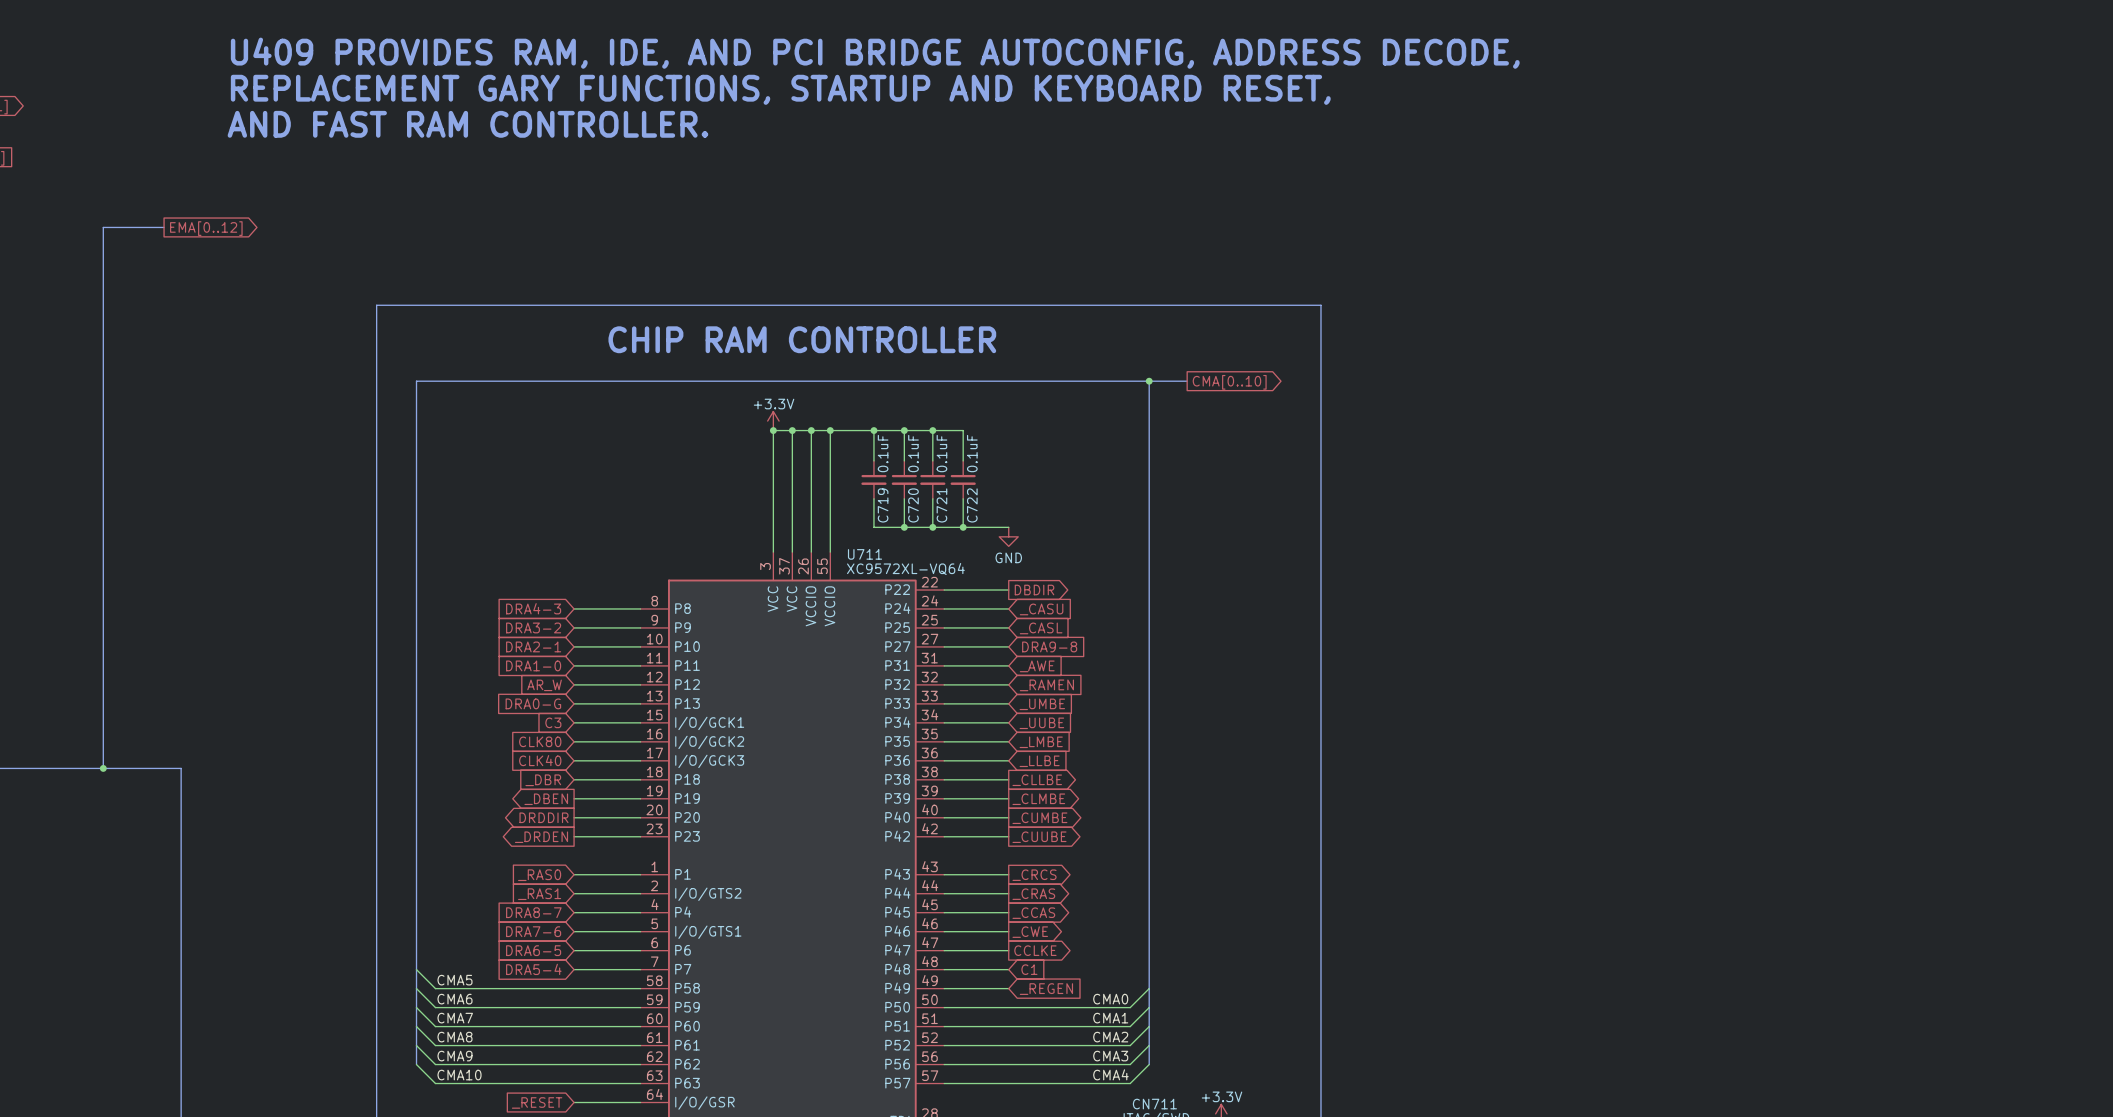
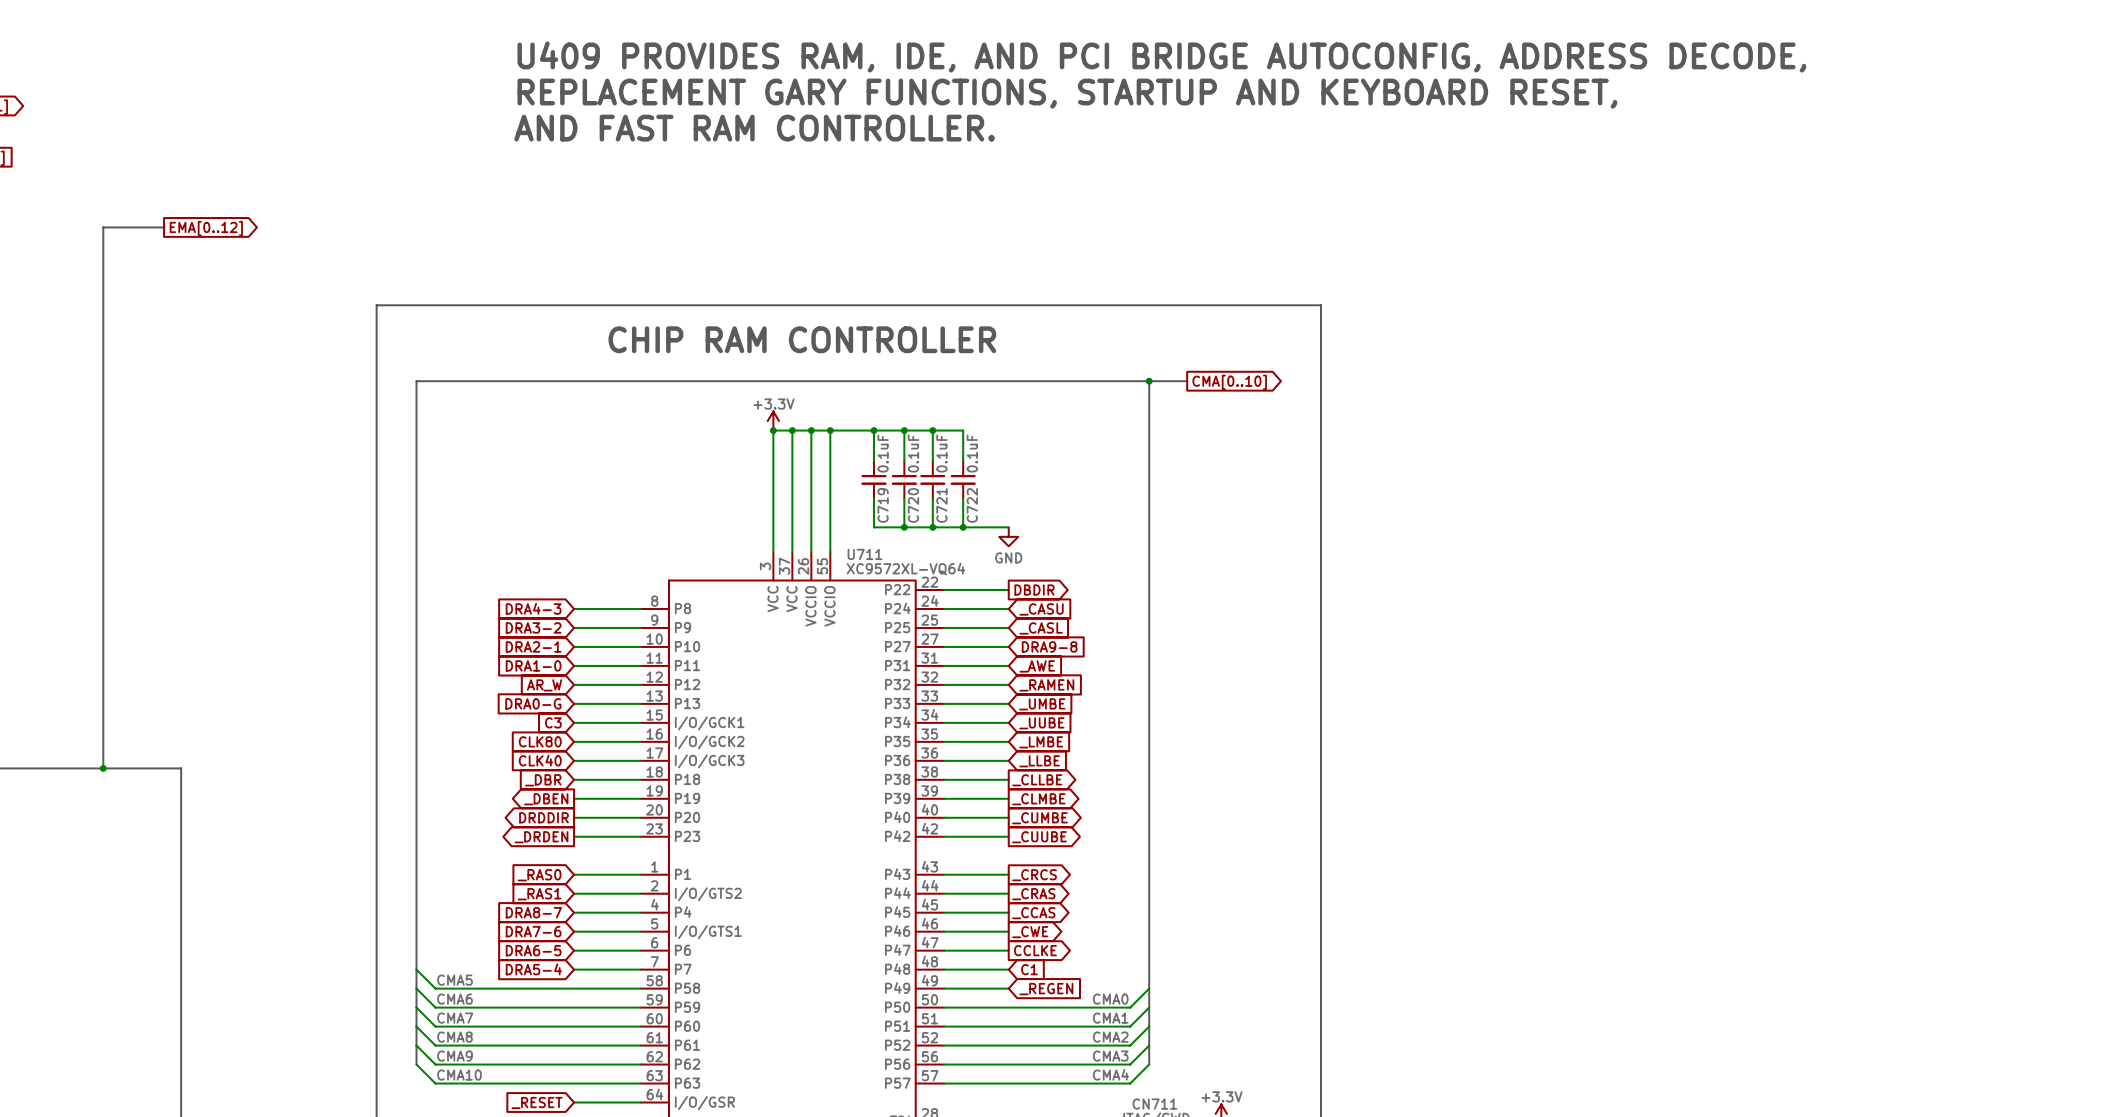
text: U409 PROVIDES RAM, IDE, AND PCI BRIDGE AUTOCONFIG, ADDRESS DECODE, (875, 53) -> none
text: none -> U409 PROVIDES RAM, IDE, AND PCI BRIDGE AUTOCONFIG, ADDRESS DECODE, (1161, 56)
text: REPLACEMENT GARY FUNCTIONS, STARTUP AND KEYBOARD RESET, (780, 89) -> none
text: none -> REPLACEMENT GARY FUNCTIONS, STARTUP AND KEYBOARD RESET, (1067, 93)
text: AND FAST RAM CONTROLLER. (467, 124) -> none
text: none -> AND FAST RAM CONTROLLER. (754, 128)

